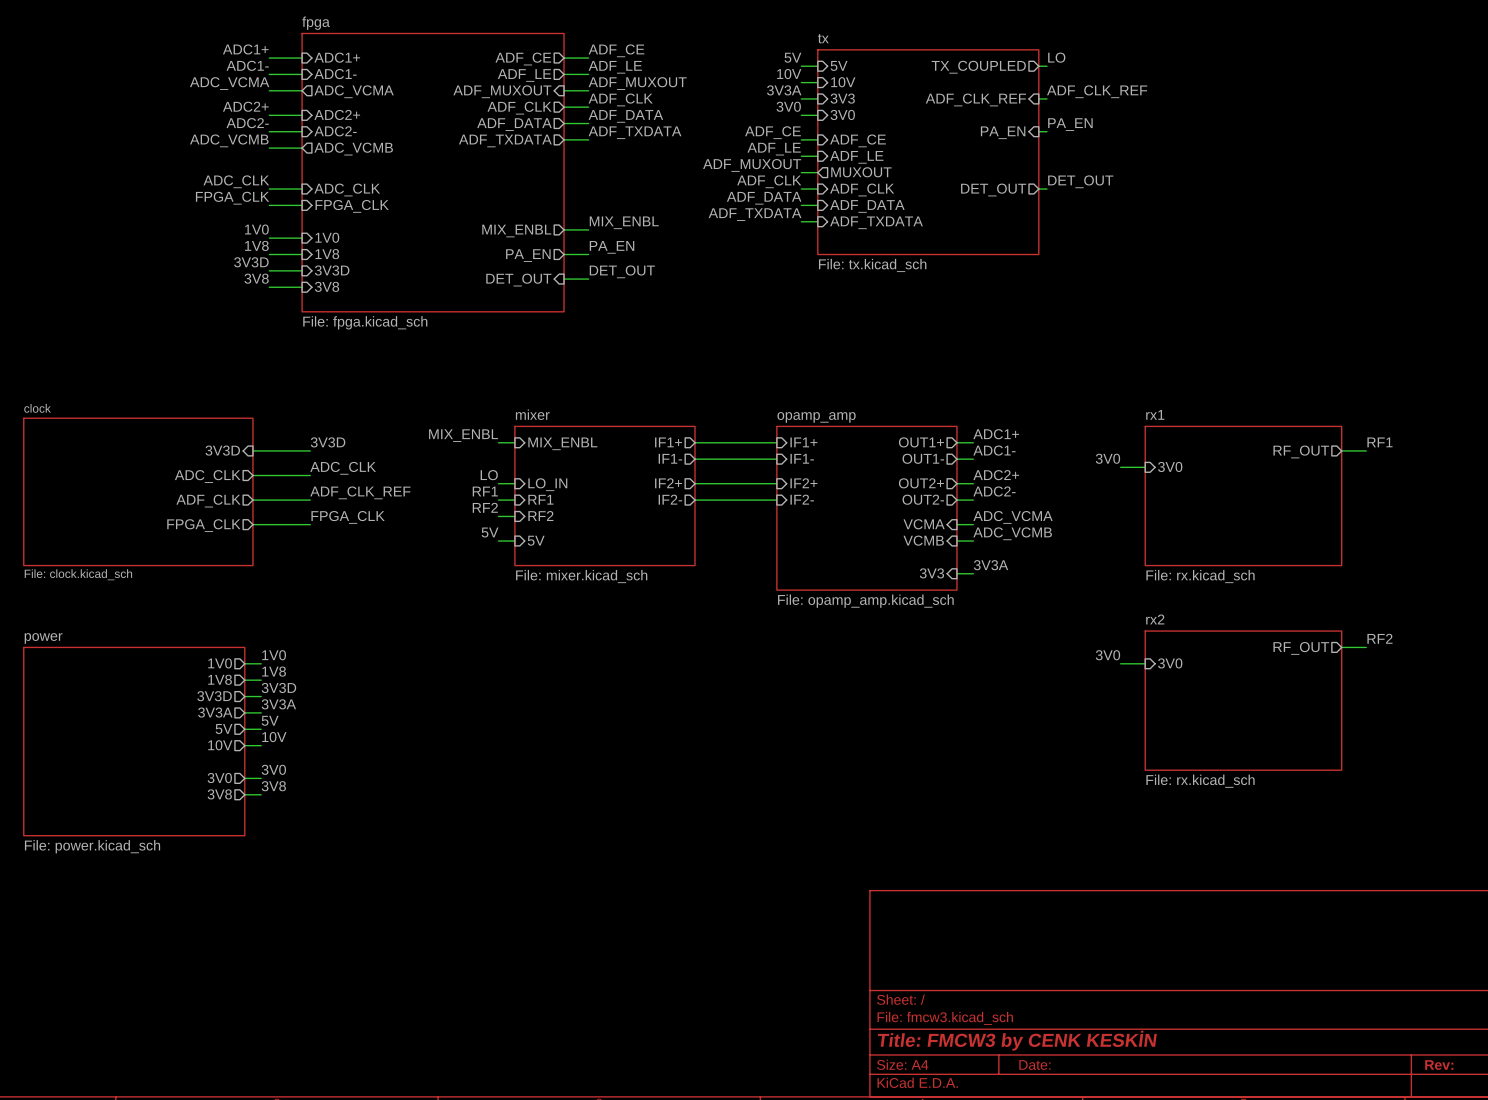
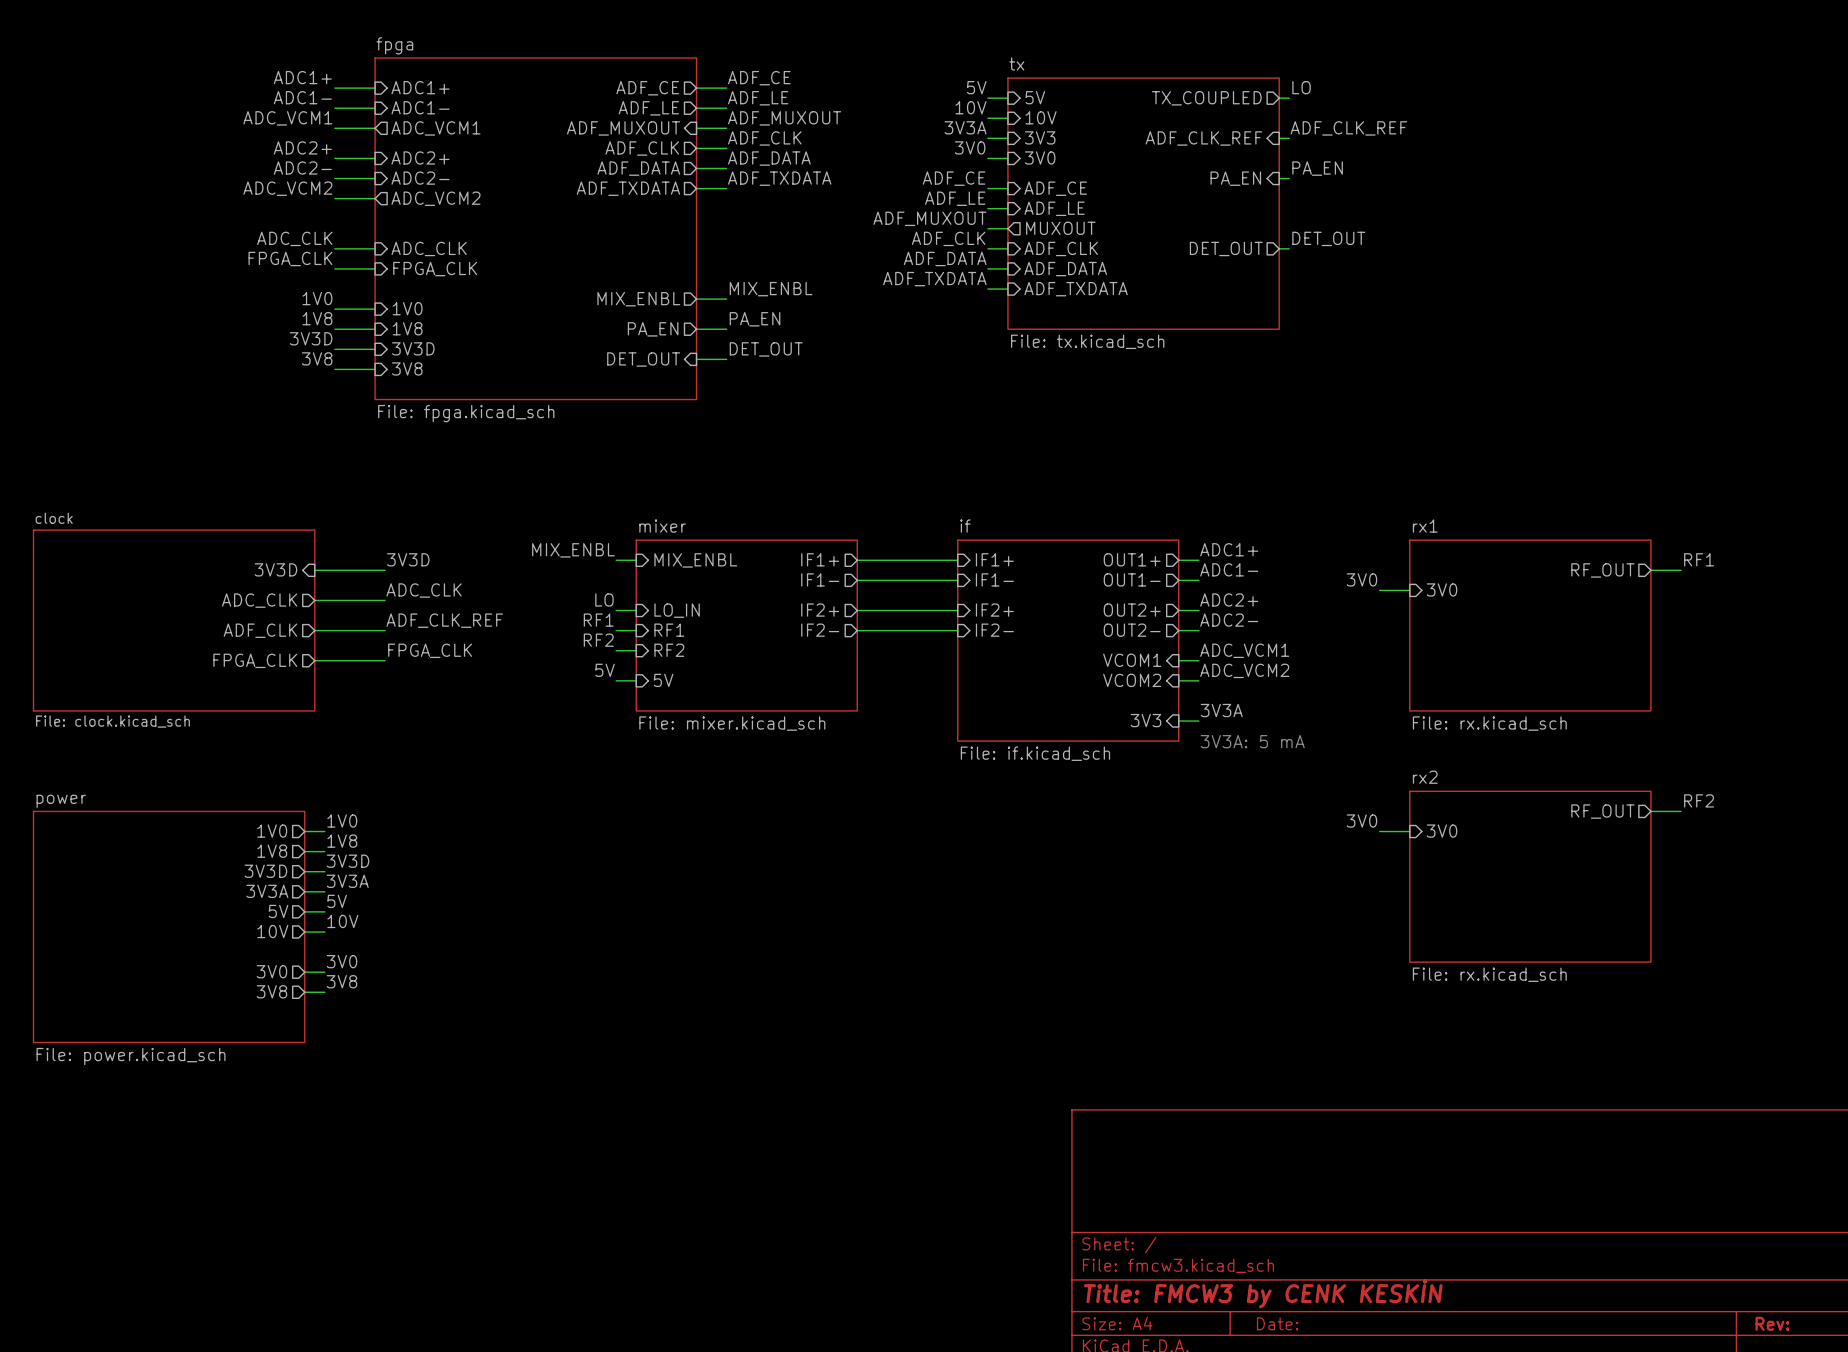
label: ADC_VCMA (229, 83) -> ADC_VCM1 (287, 118)
sheet pin: ADC_VCMA (354, 91) -> ADC_VCM1 (435, 128)
label: ADC_VCMB (229, 140) -> ADC_VCM2 (287, 188)
sheet pin: ADC_VCMB (353, 149) -> ADC_VCM2 (435, 198)
sheet opamp_amp name: opamp_amp (816, 417) -> if (965, 526)
label: ADC_VCMA (1013, 517) -> ADC_VCM1 (1244, 650)
sheet pin: VCMA (924, 524) -> VCOM1 (1132, 660)
label: ADC_VCMB (1012, 533) -> ADC_VCM2 (1244, 670)
sheet pin: VCMB (923, 540) -> VCOM2 (1132, 680)
text: none -> 3V3A: 5 mA (1252, 741)
sheet opamp_amp value: File: opamp_amp.kicad_sch (865, 601) -> File: if.kicad_sch (1035, 753)

